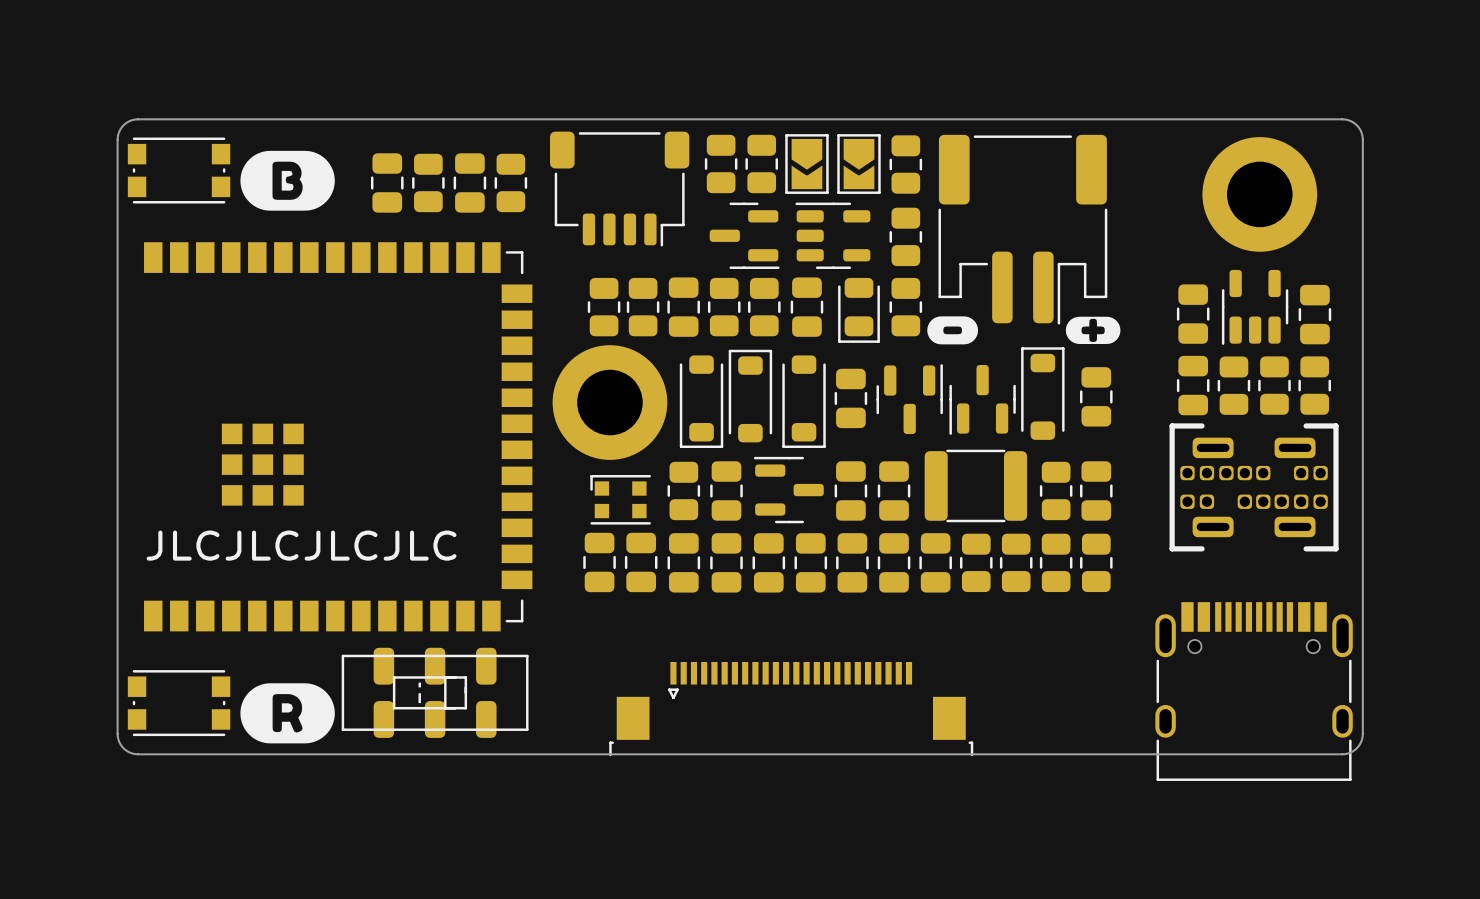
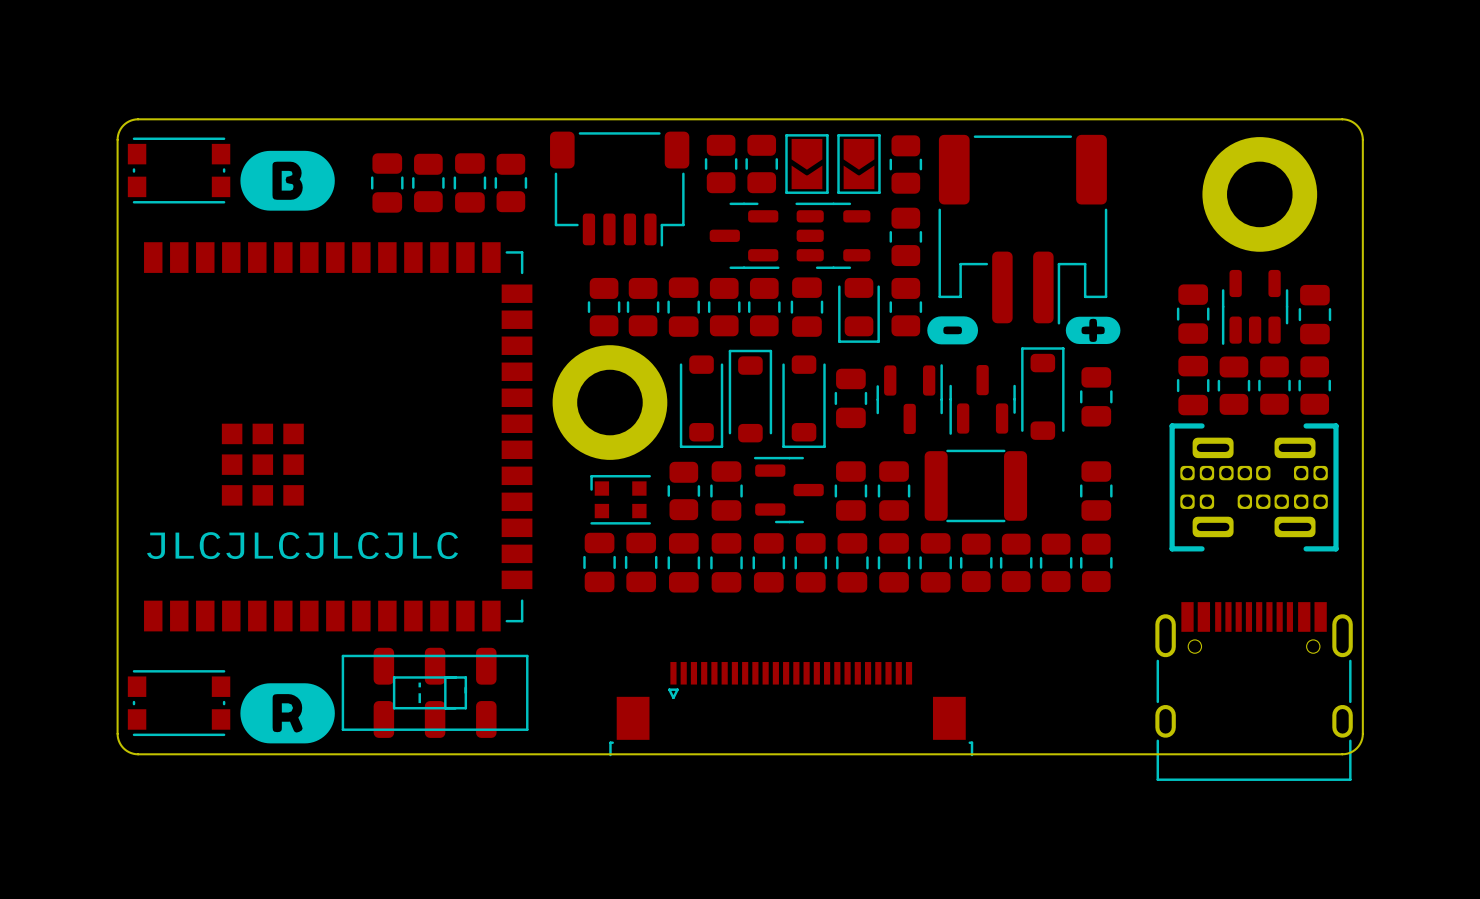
part: (1056, 490) -> none

